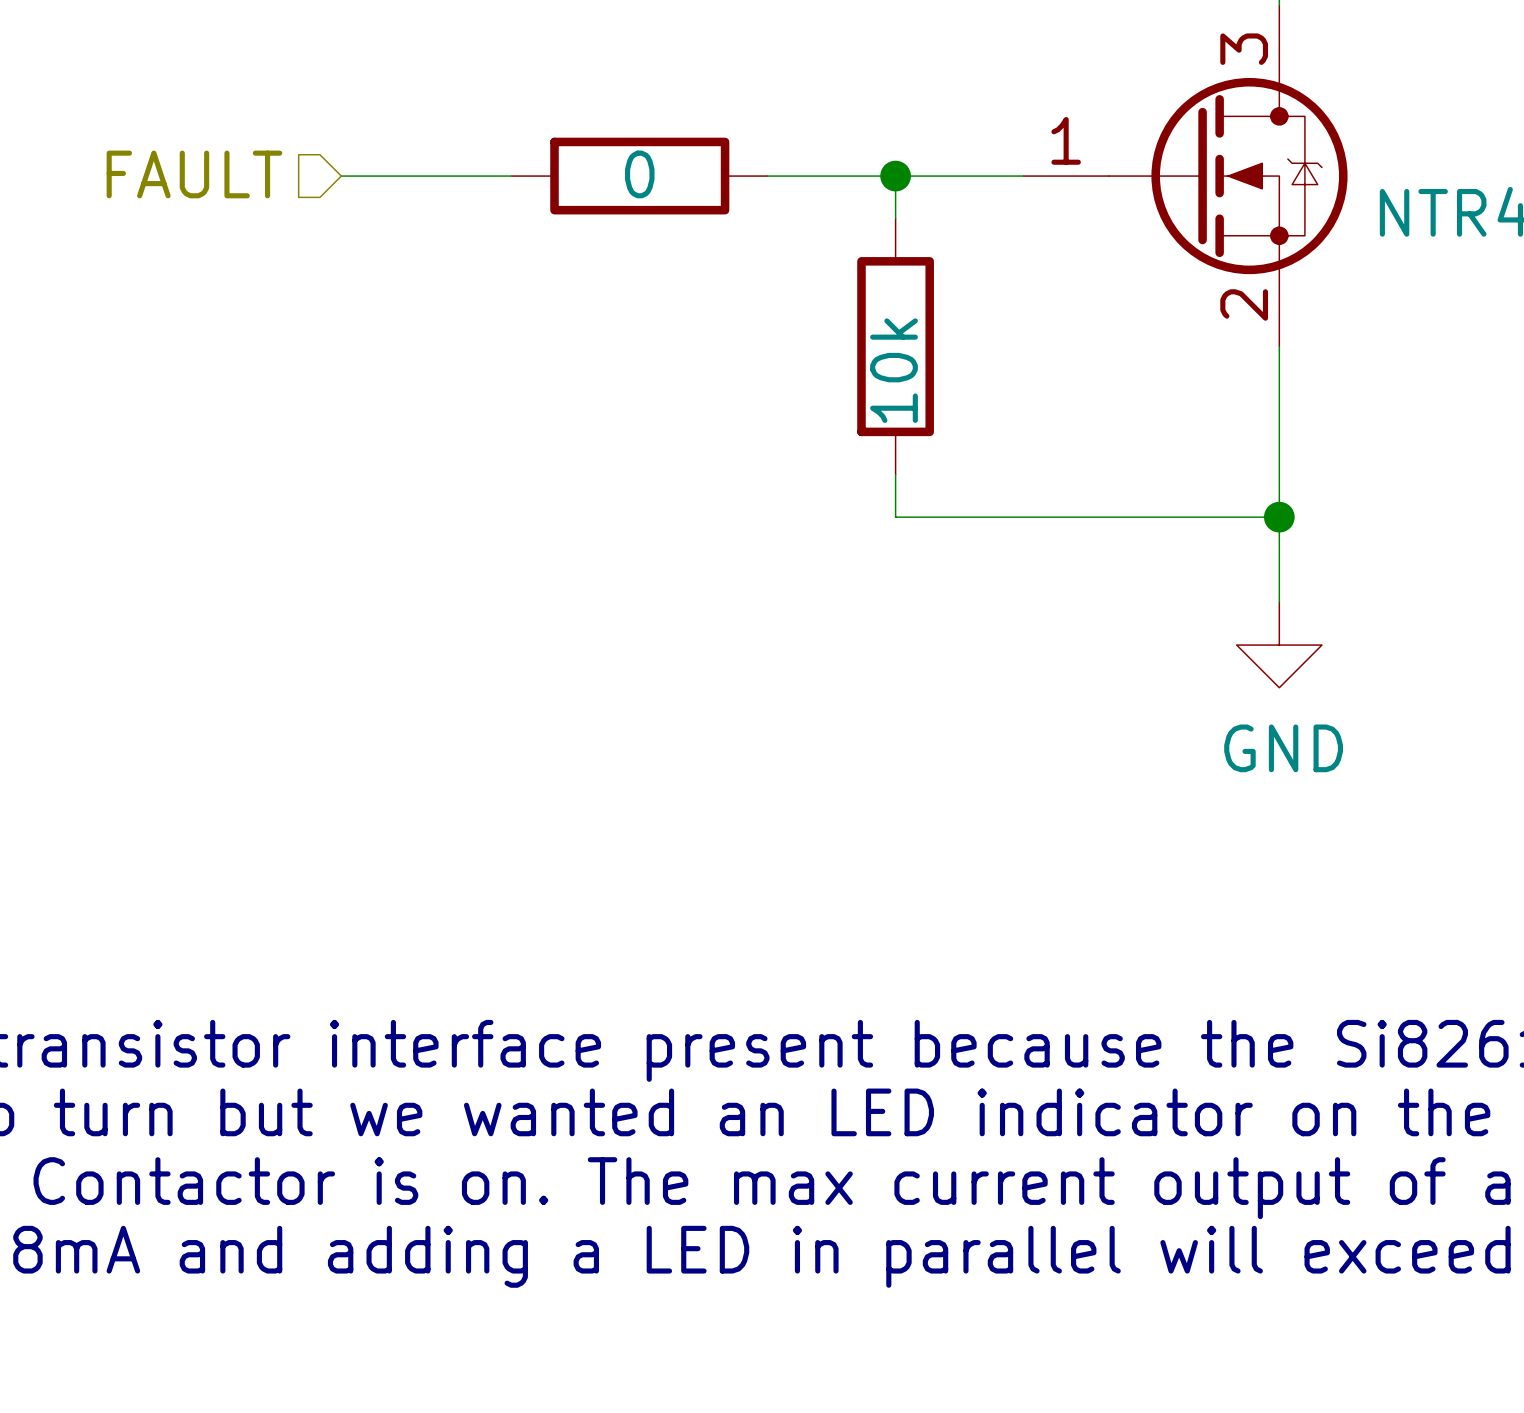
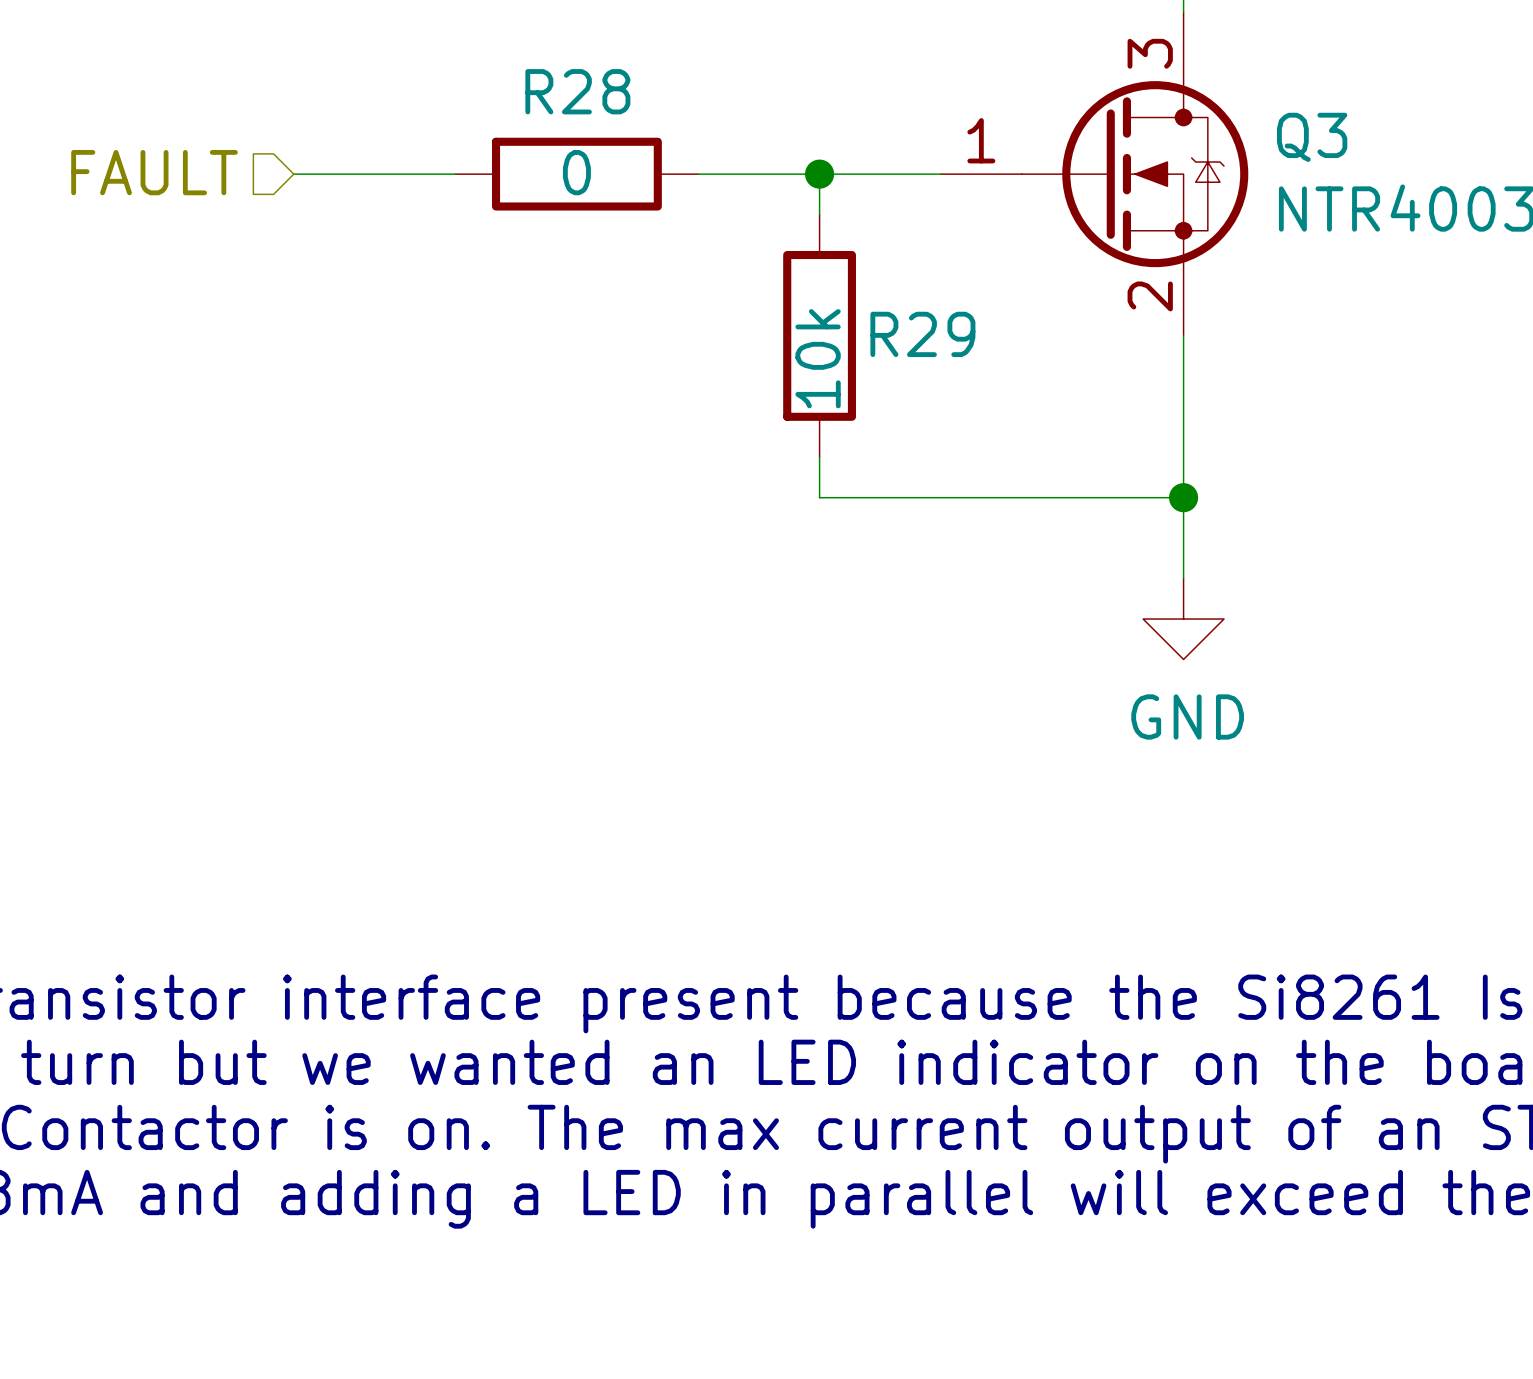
R28 name: none -> R28 (577, 91)
Q3 name: none -> Q3 (1312, 137)
R29 name: none -> R29 (922, 334)

